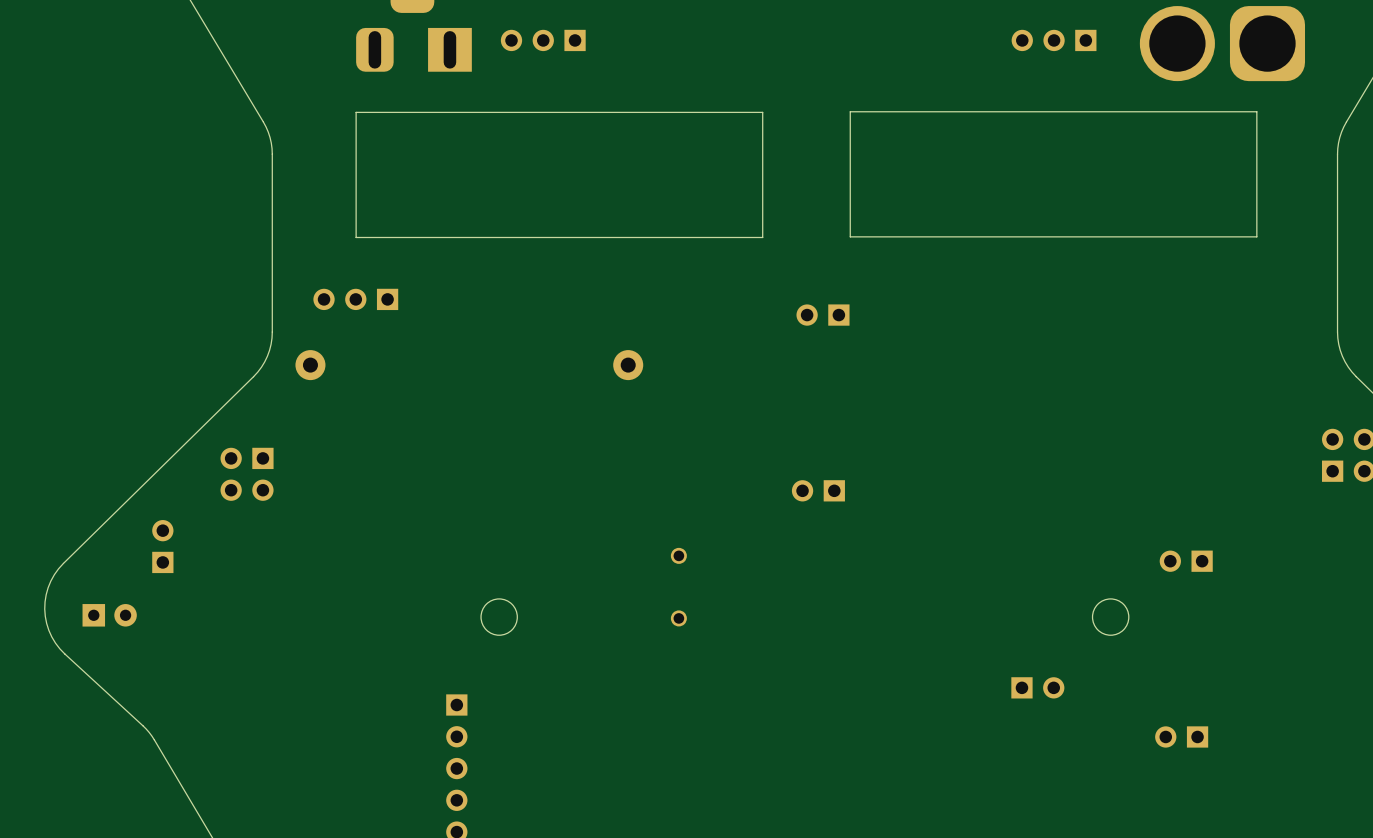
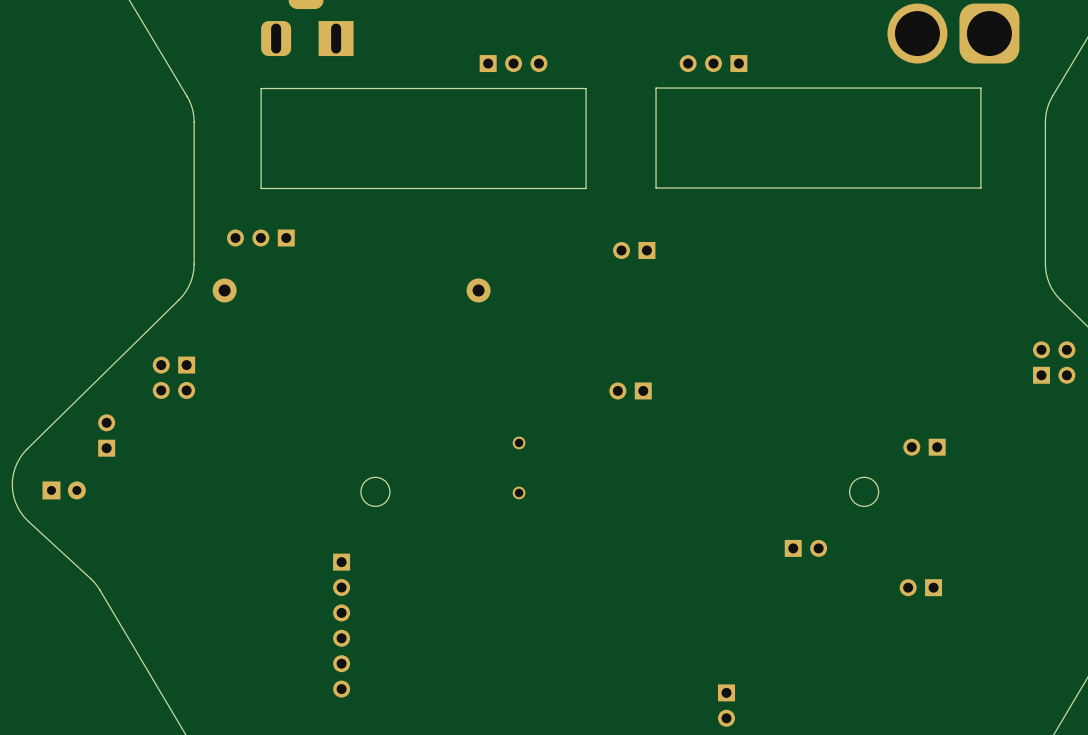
part rotation: 0° (543, 40) -> 180° (513, 63)
part position: (543, 40) -> (513, 63)
part position: (1054, 40) -> (713, 63)

